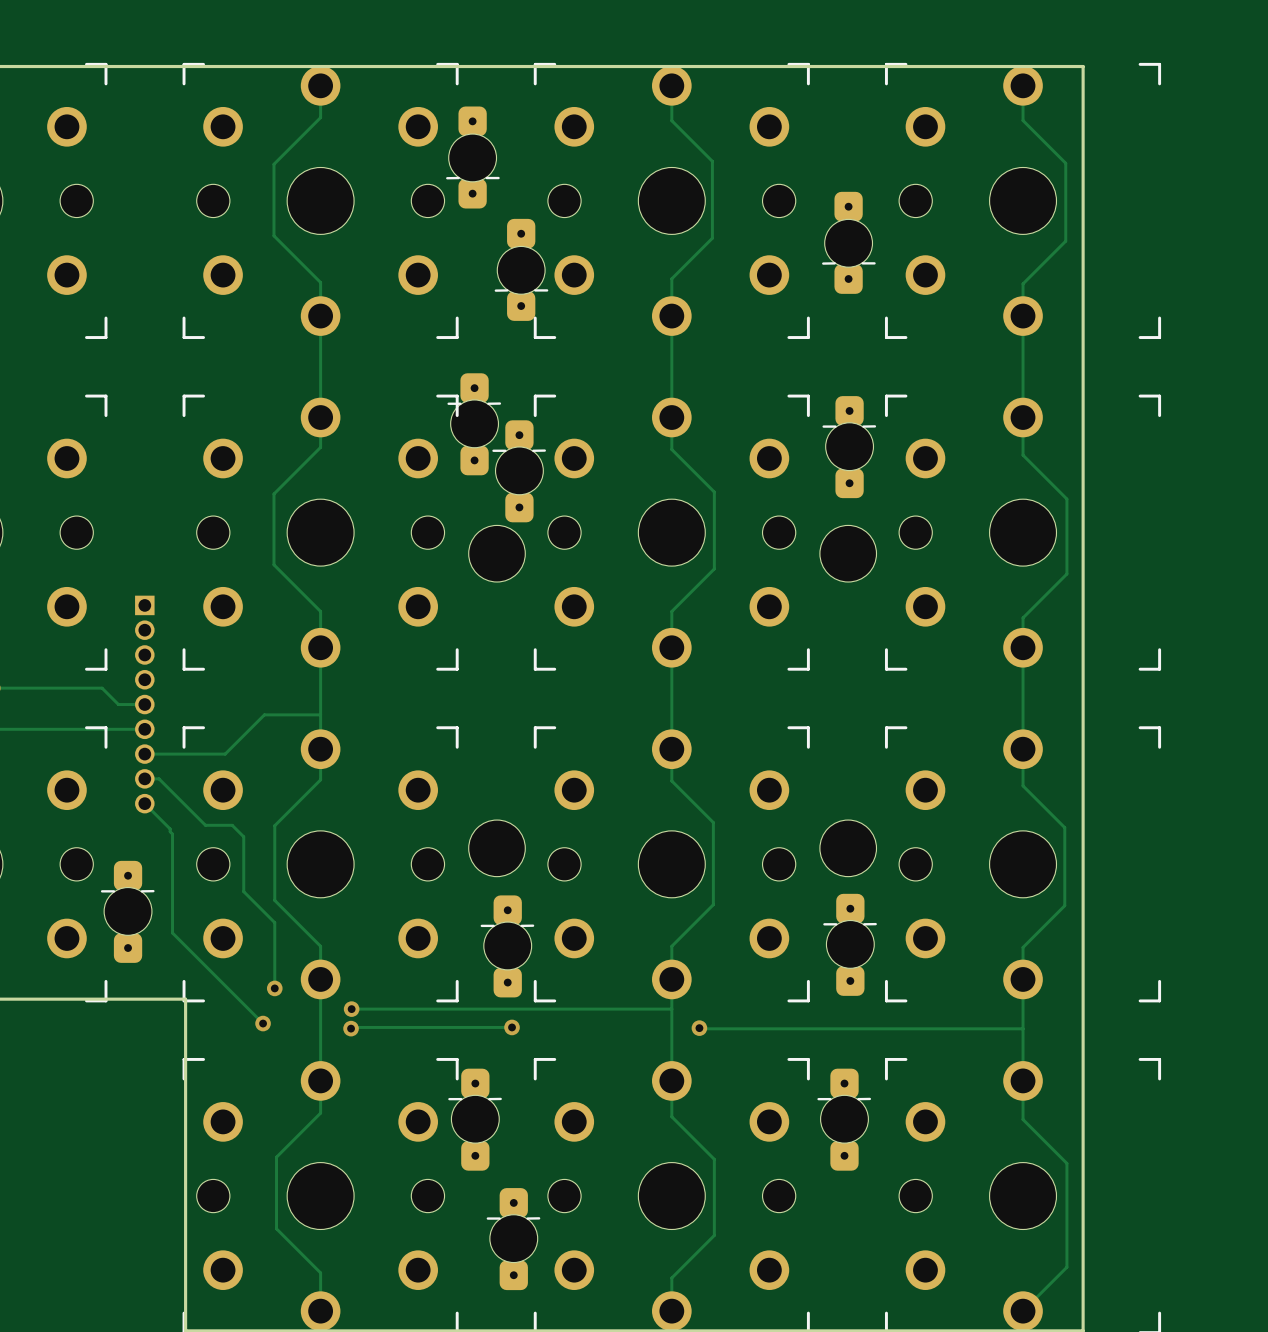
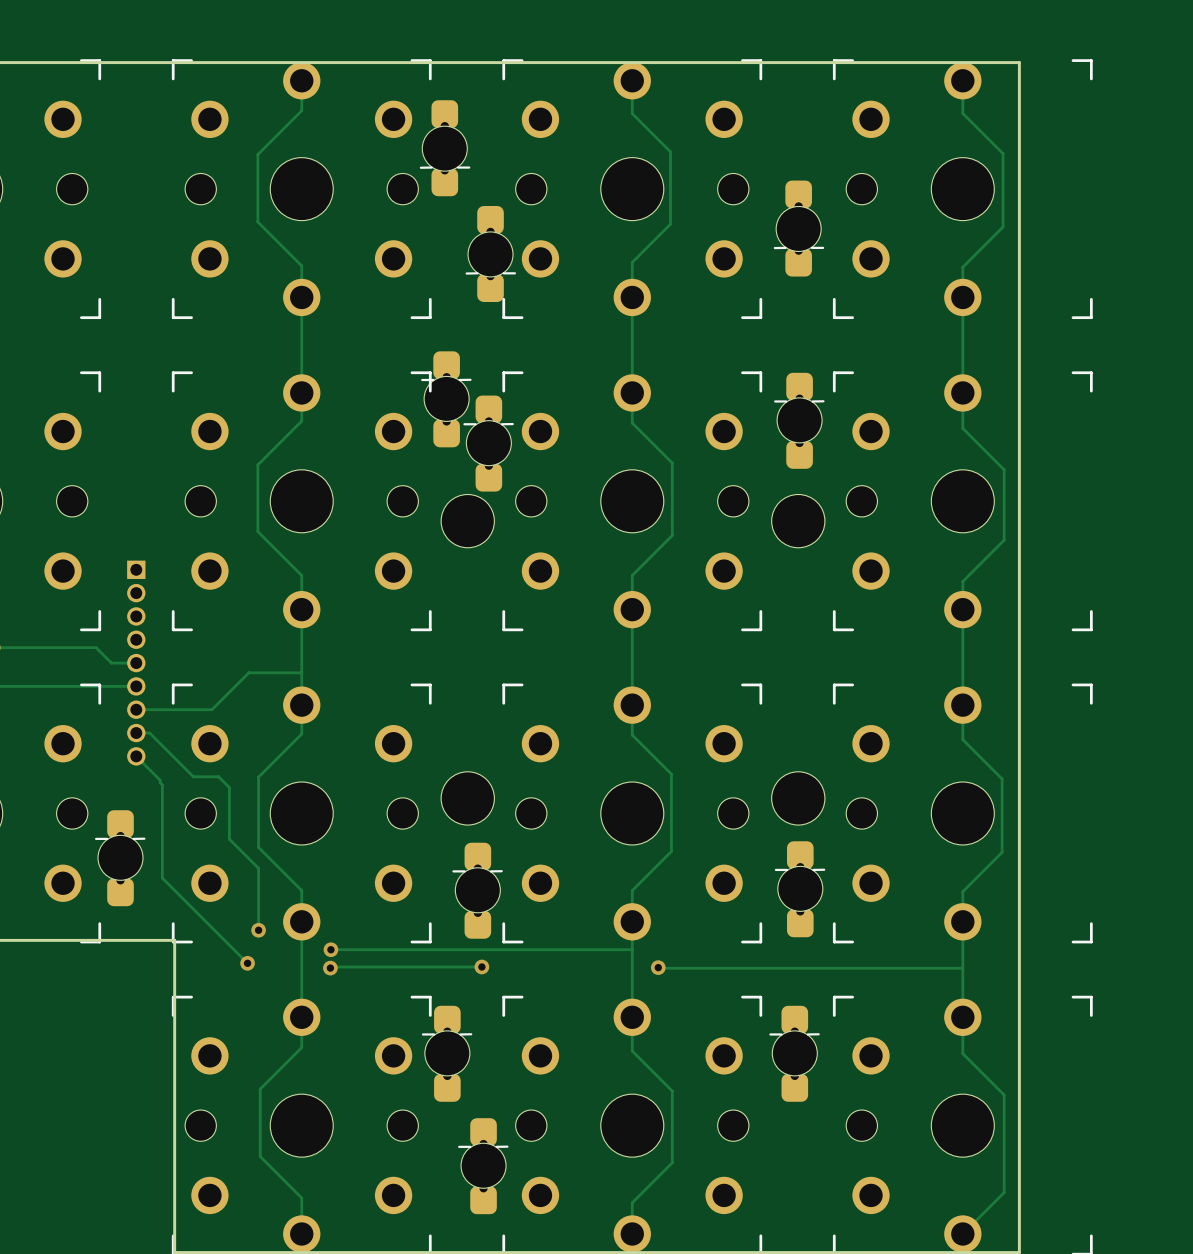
part footprint: [446, 106, 500, 209] -> [419, 100, 471, 197]
part footprint: [822, 191, 876, 294] -> [773, 180, 825, 277]
part footprint: [494, 218, 549, 321] -> [465, 206, 517, 303]
part footprint: [447, 373, 502, 476] -> [421, 351, 472, 448]
part footprint: [822, 396, 877, 499] -> [774, 372, 825, 469]
part footprint: [492, 420, 546, 523] -> [463, 395, 514, 492]
part footprint: [100, 860, 155, 963] -> [94, 810, 146, 907]
part footprint: [823, 893, 877, 996] -> [774, 841, 826, 938]
part footprint: [480, 895, 535, 998] -> [452, 842, 503, 939]
part footprint: [448, 1068, 502, 1171] -> [421, 1005, 473, 1102]
part footprint: [817, 1068, 872, 1171] -> [769, 1005, 820, 1102]
part footprint: [486, 1188, 541, 1291] -> [458, 1118, 509, 1215]

